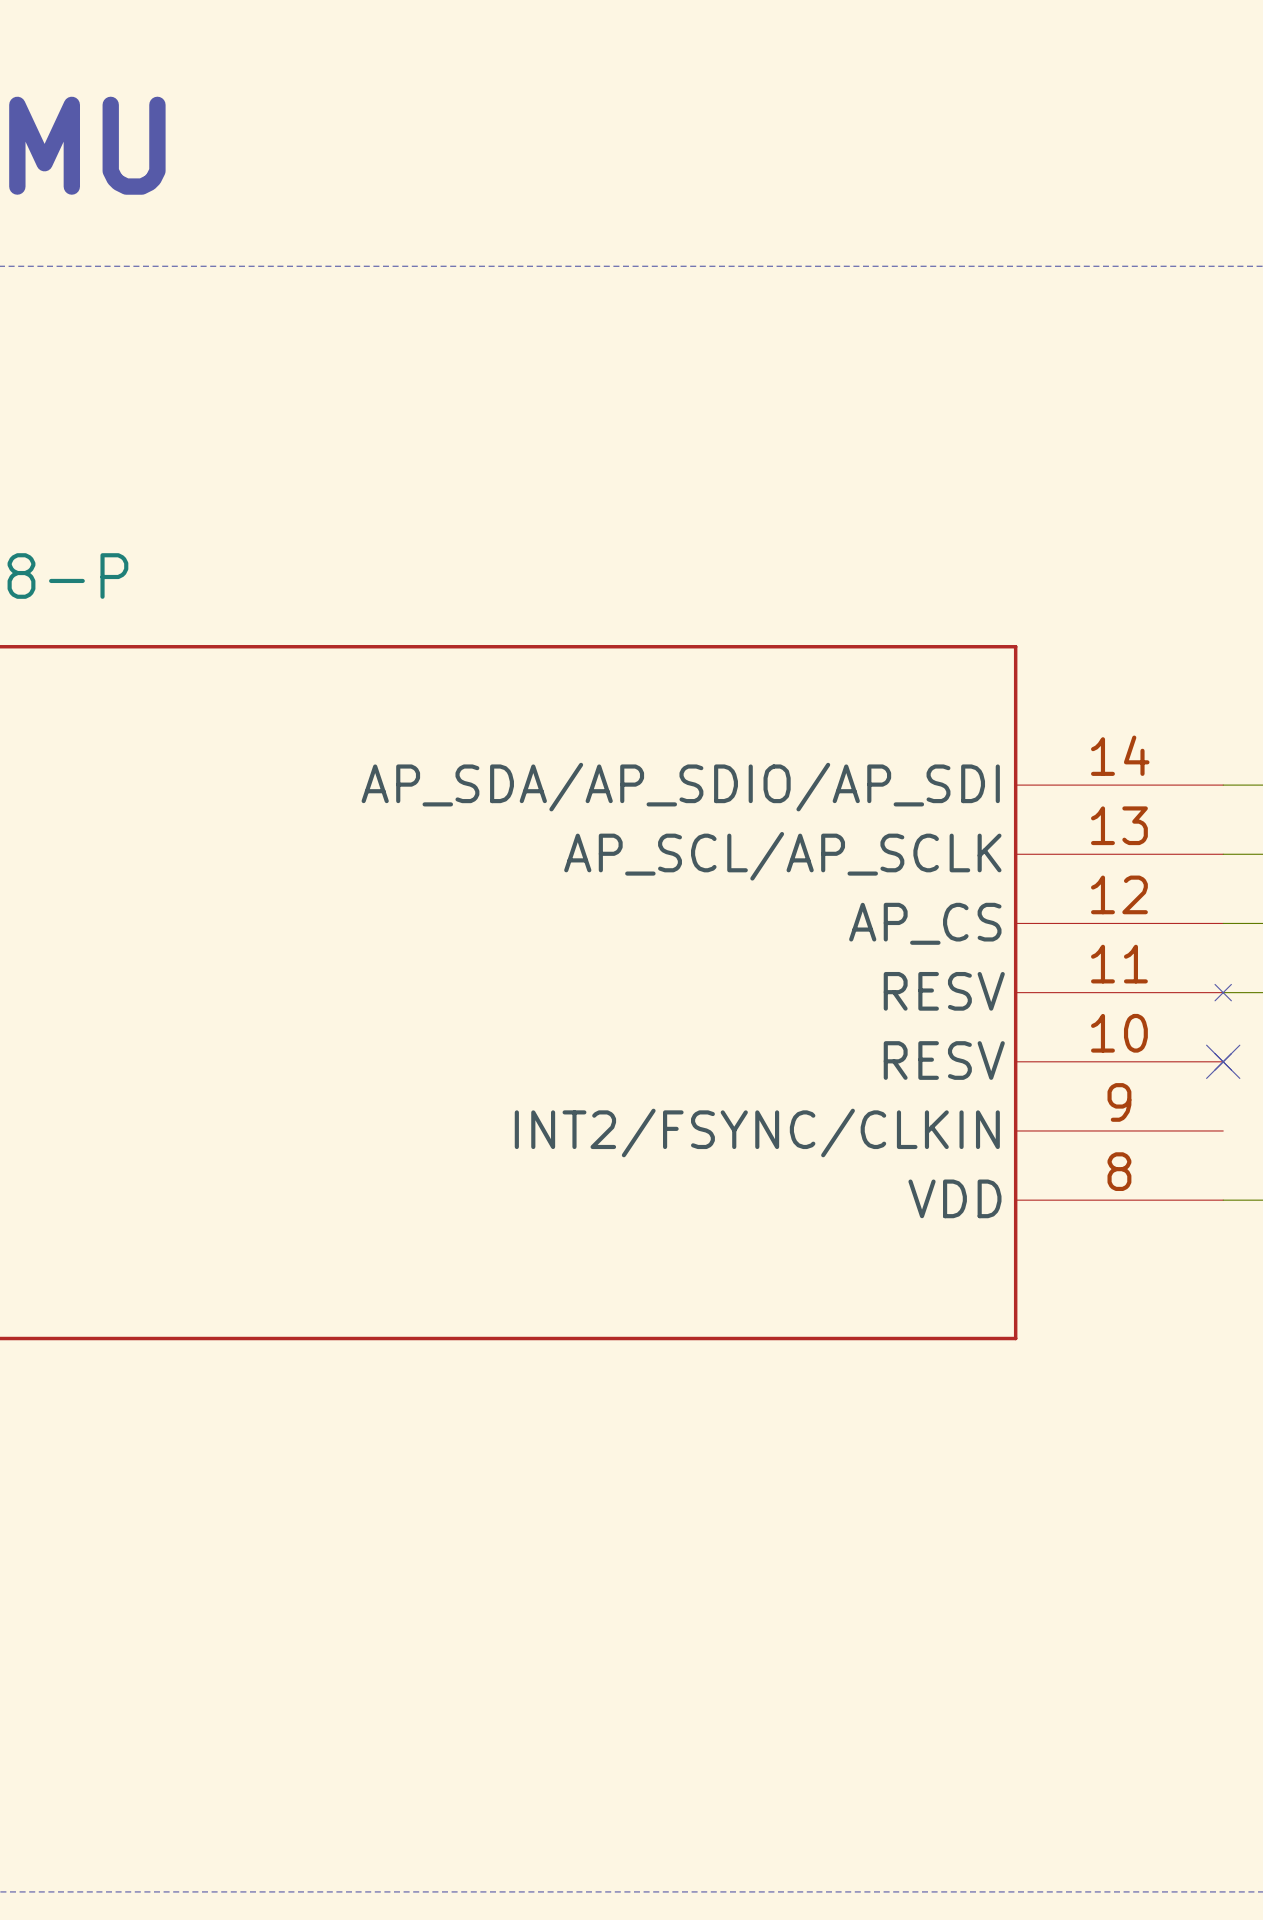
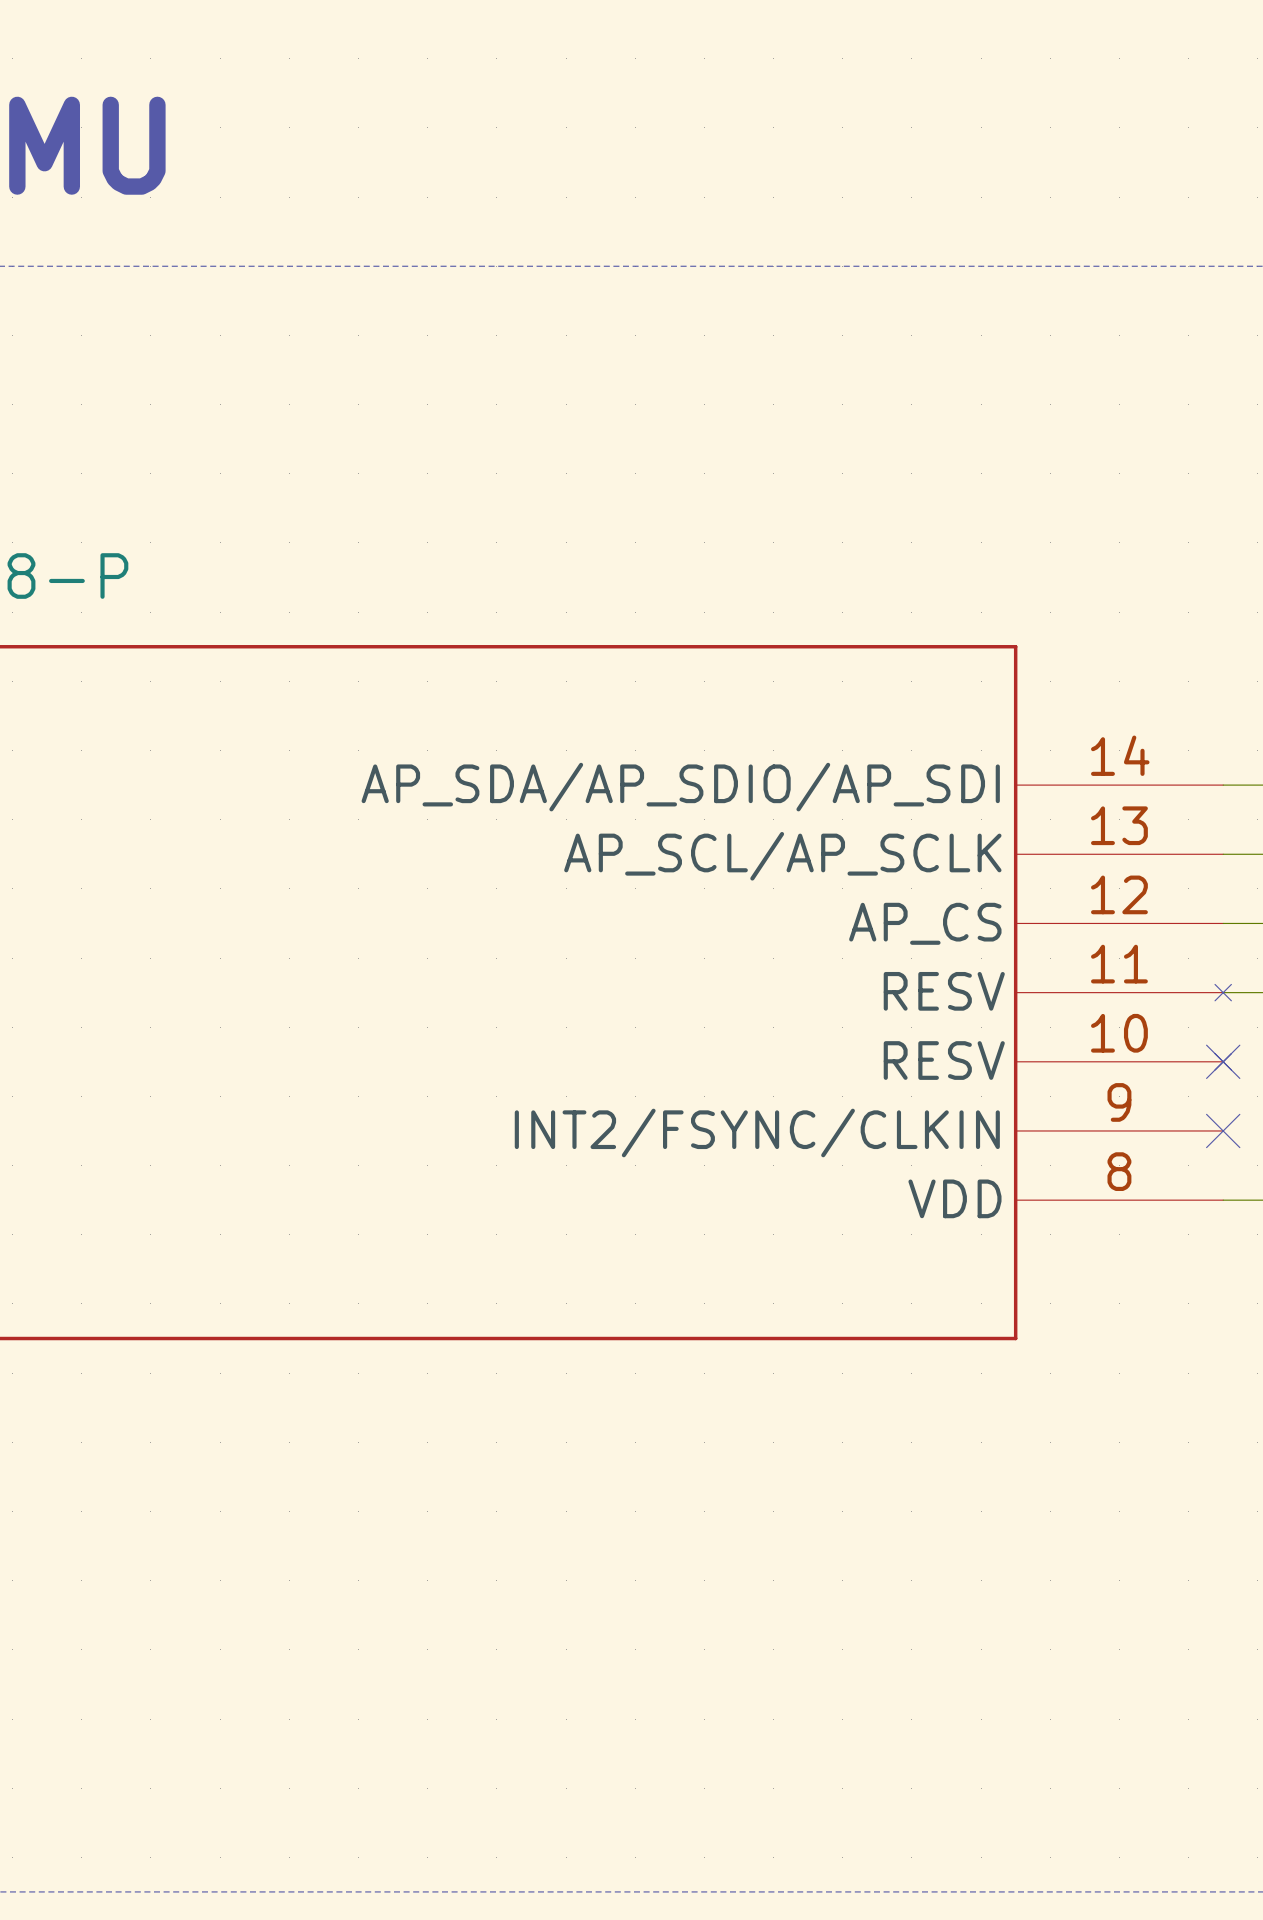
no-connect mark: none -> (1223, 1130)

